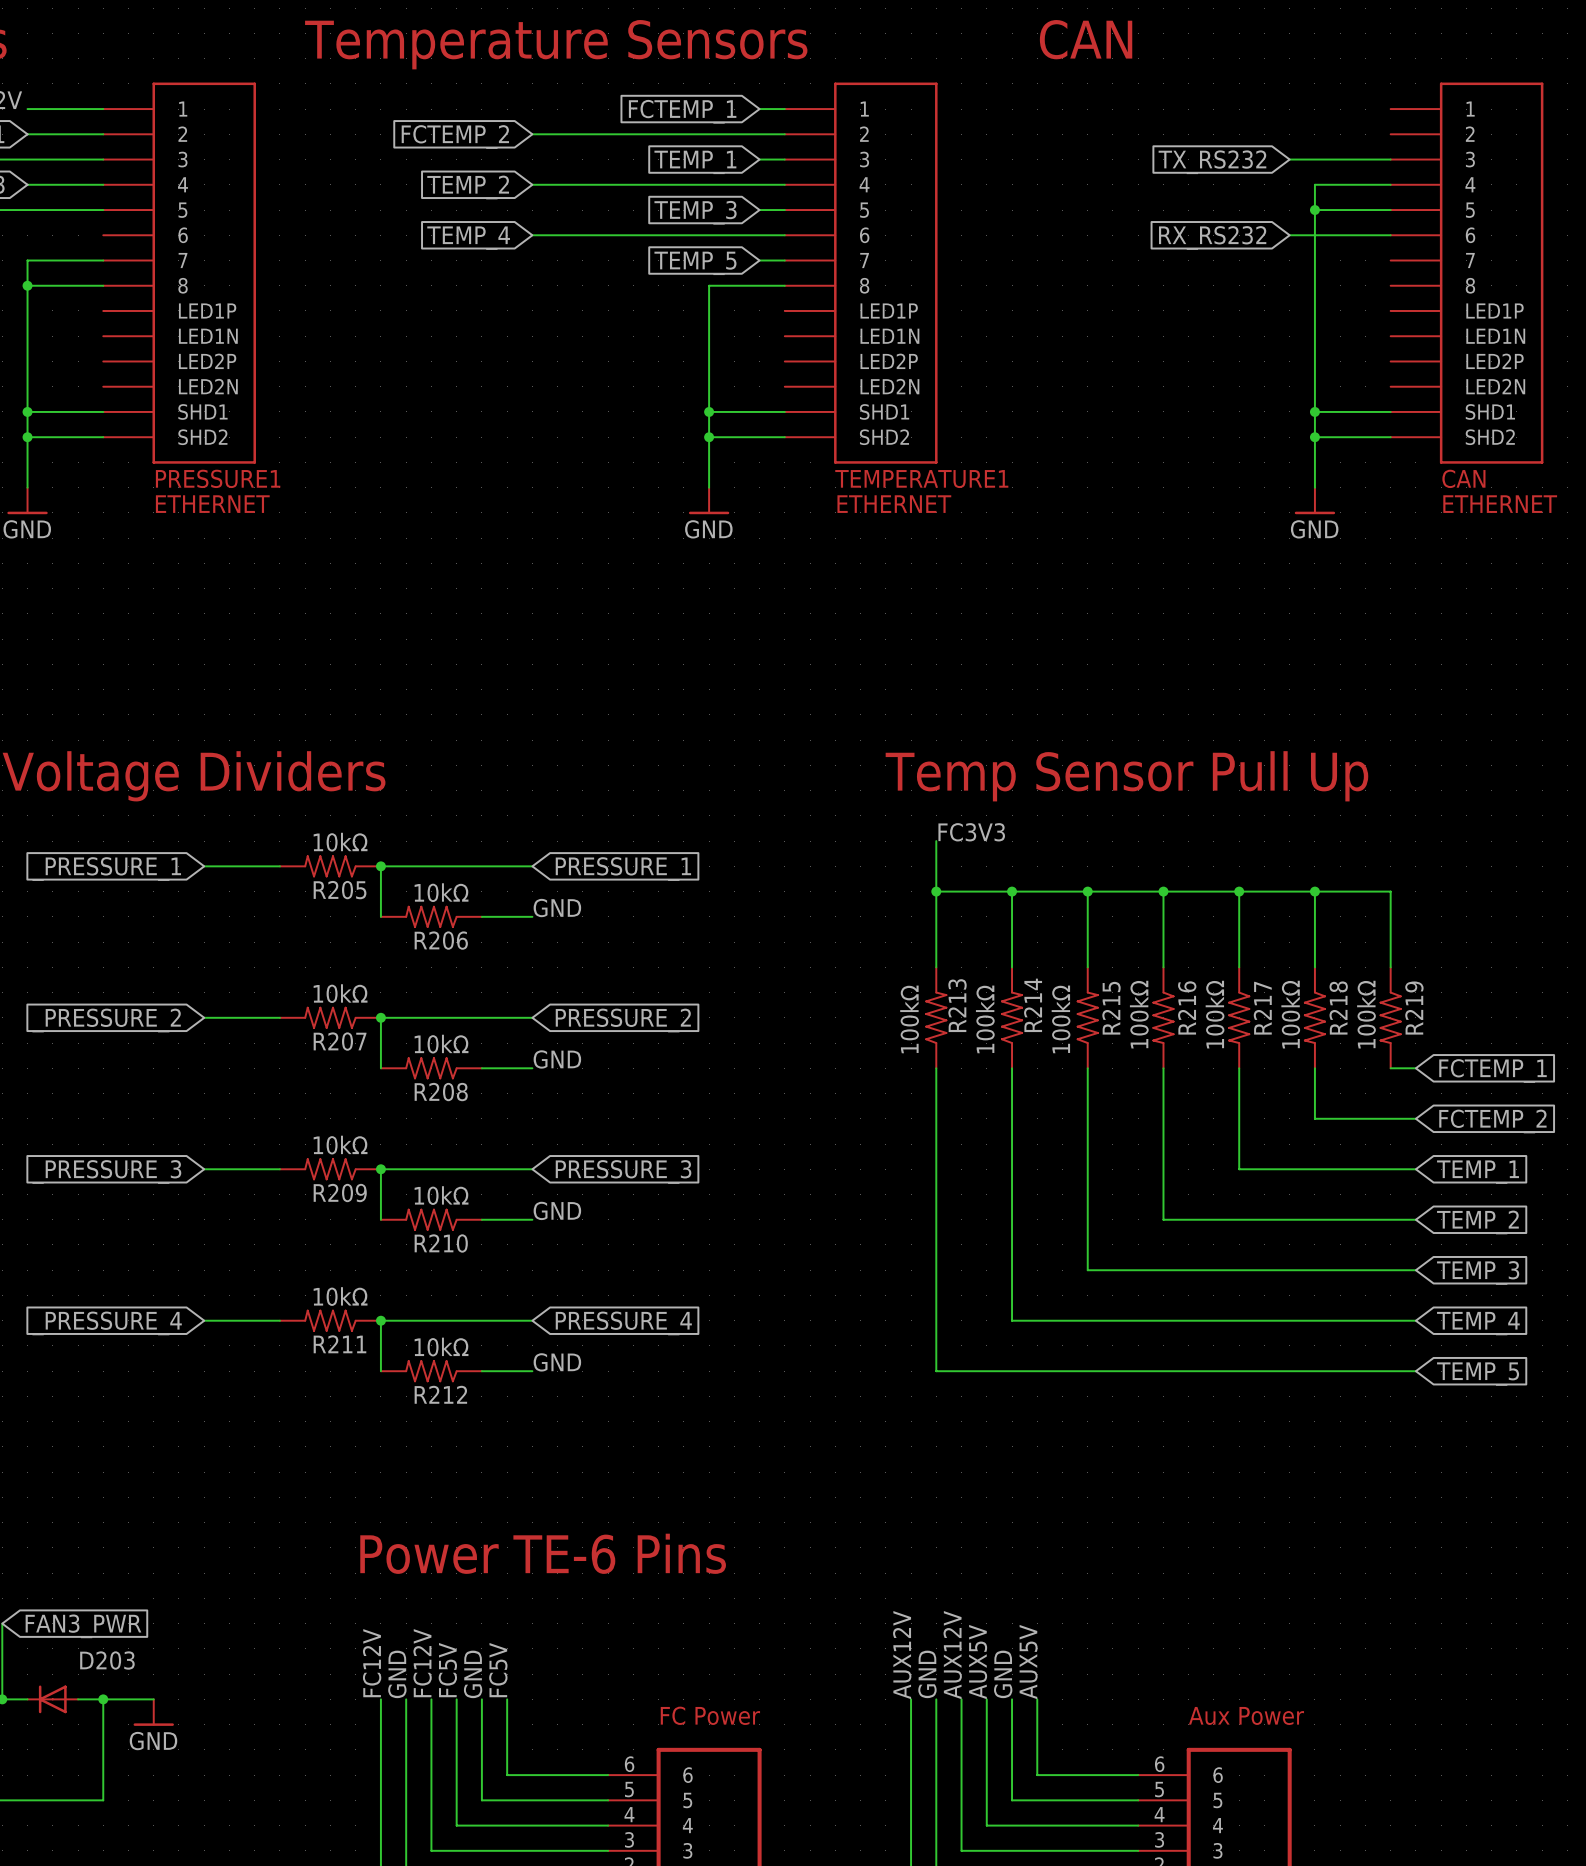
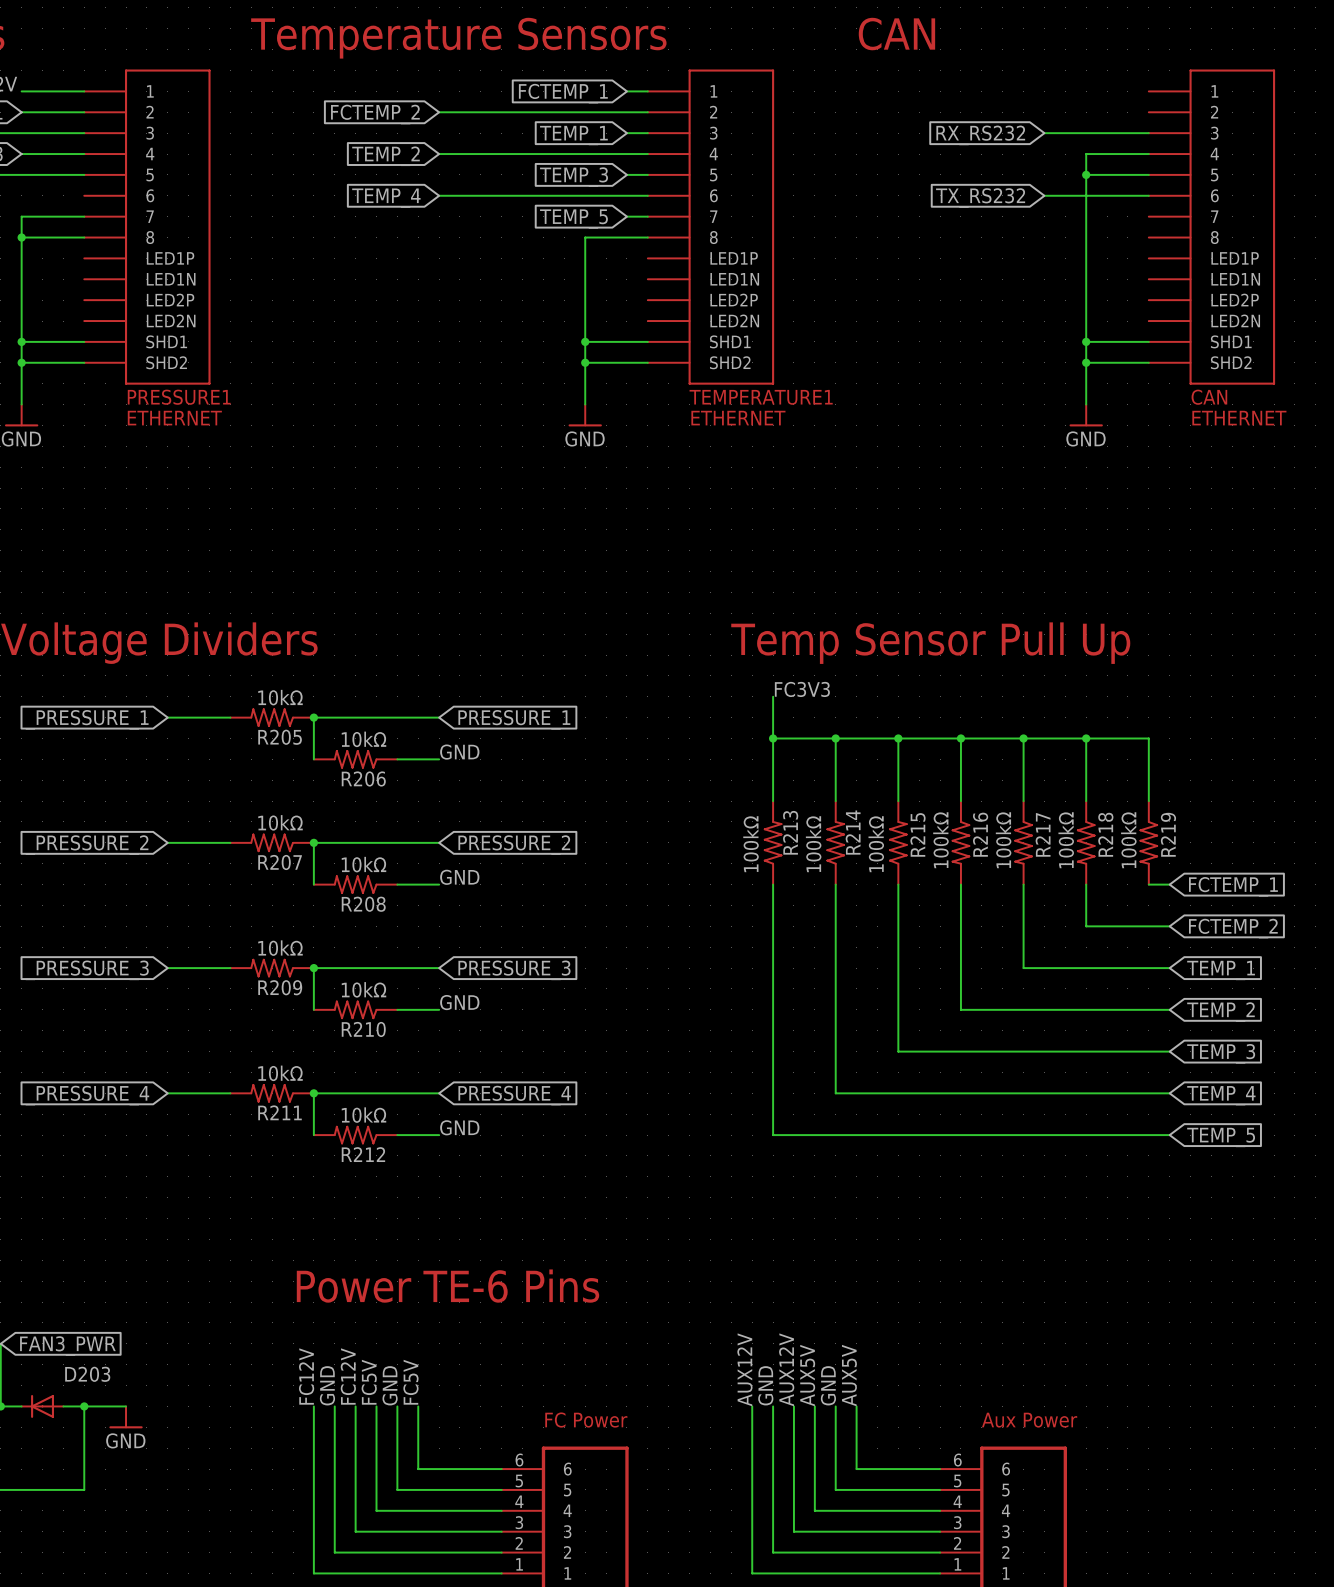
wire: none -> (1044, 133) (1065, 133)
global label position: TX_RS232 (1212, 162) -> TX_RS232 (980, 198)
wire: none -> (1044, 195) (1065, 195)
global label position: RX_RS232 (1212, 237) -> RX_RS232 (980, 135)

